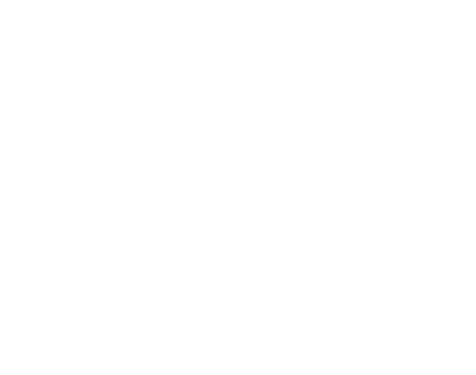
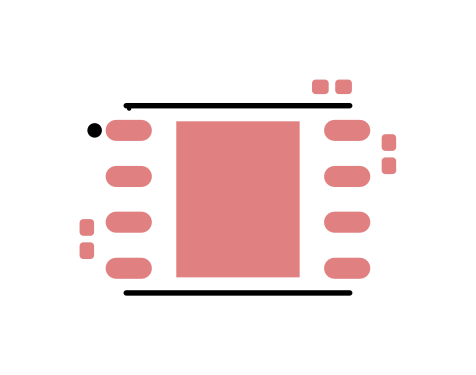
part: none -> (331, 86)
part: none -> (388, 154)
part: none -> (228, 199)
part: none -> (86, 239)

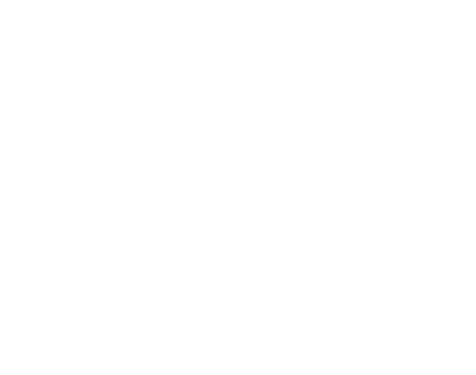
part: (331, 86) -> none
part: (388, 154) -> none
part: (228, 199) -> none
part: (86, 239) -> none

